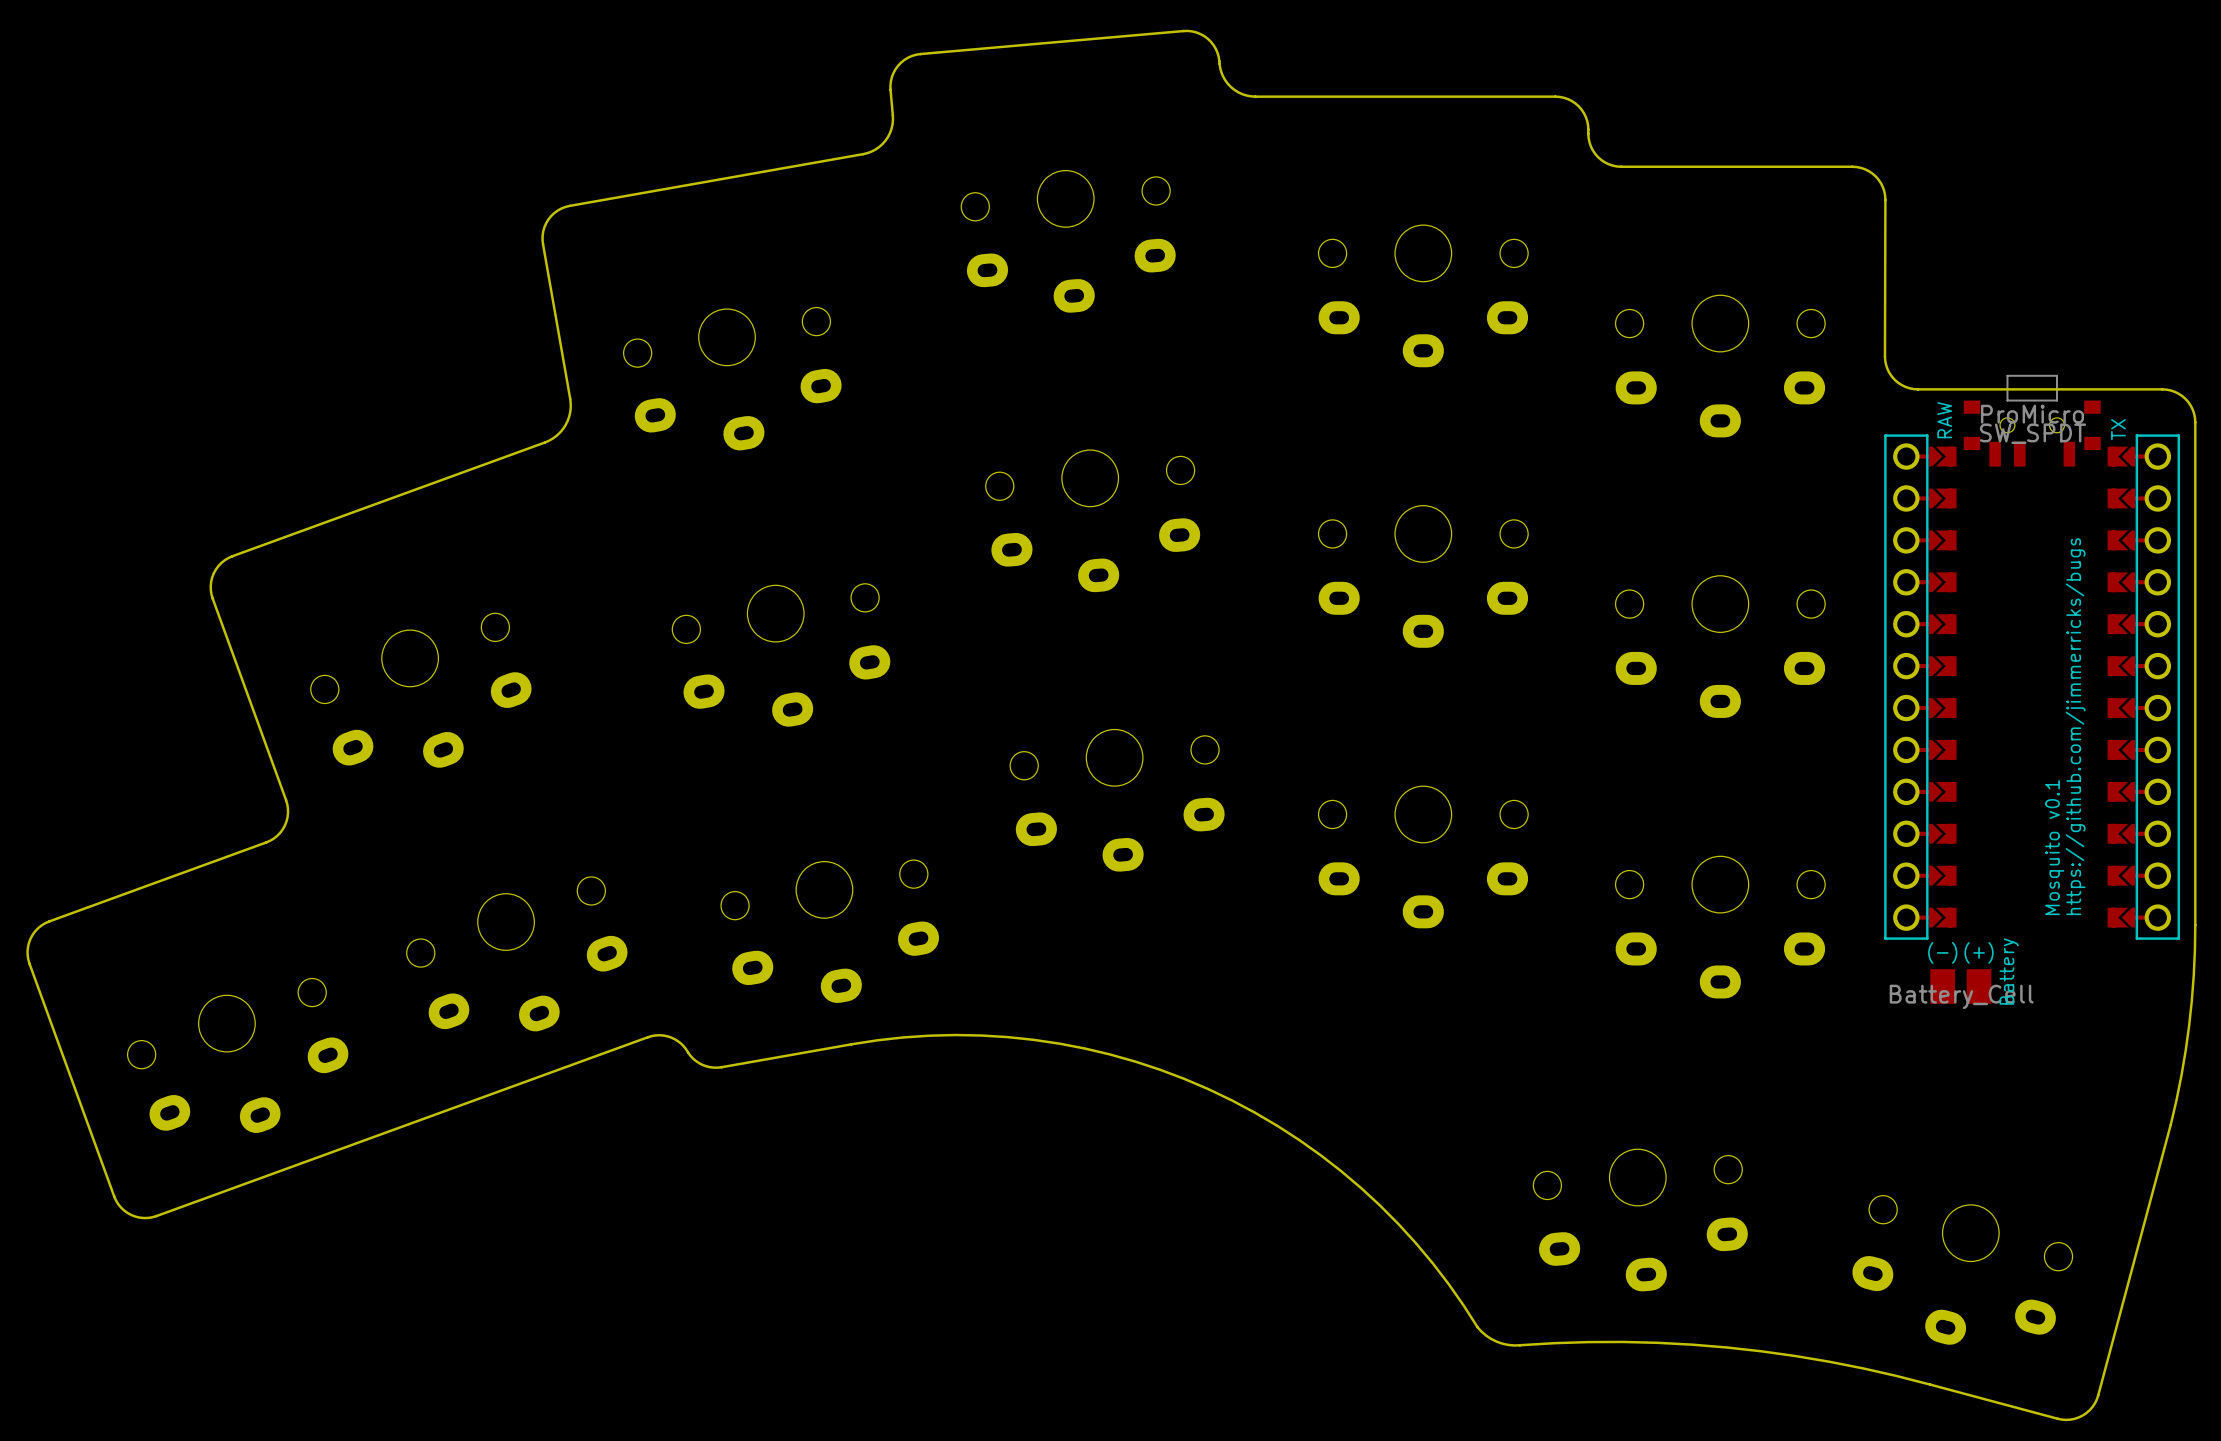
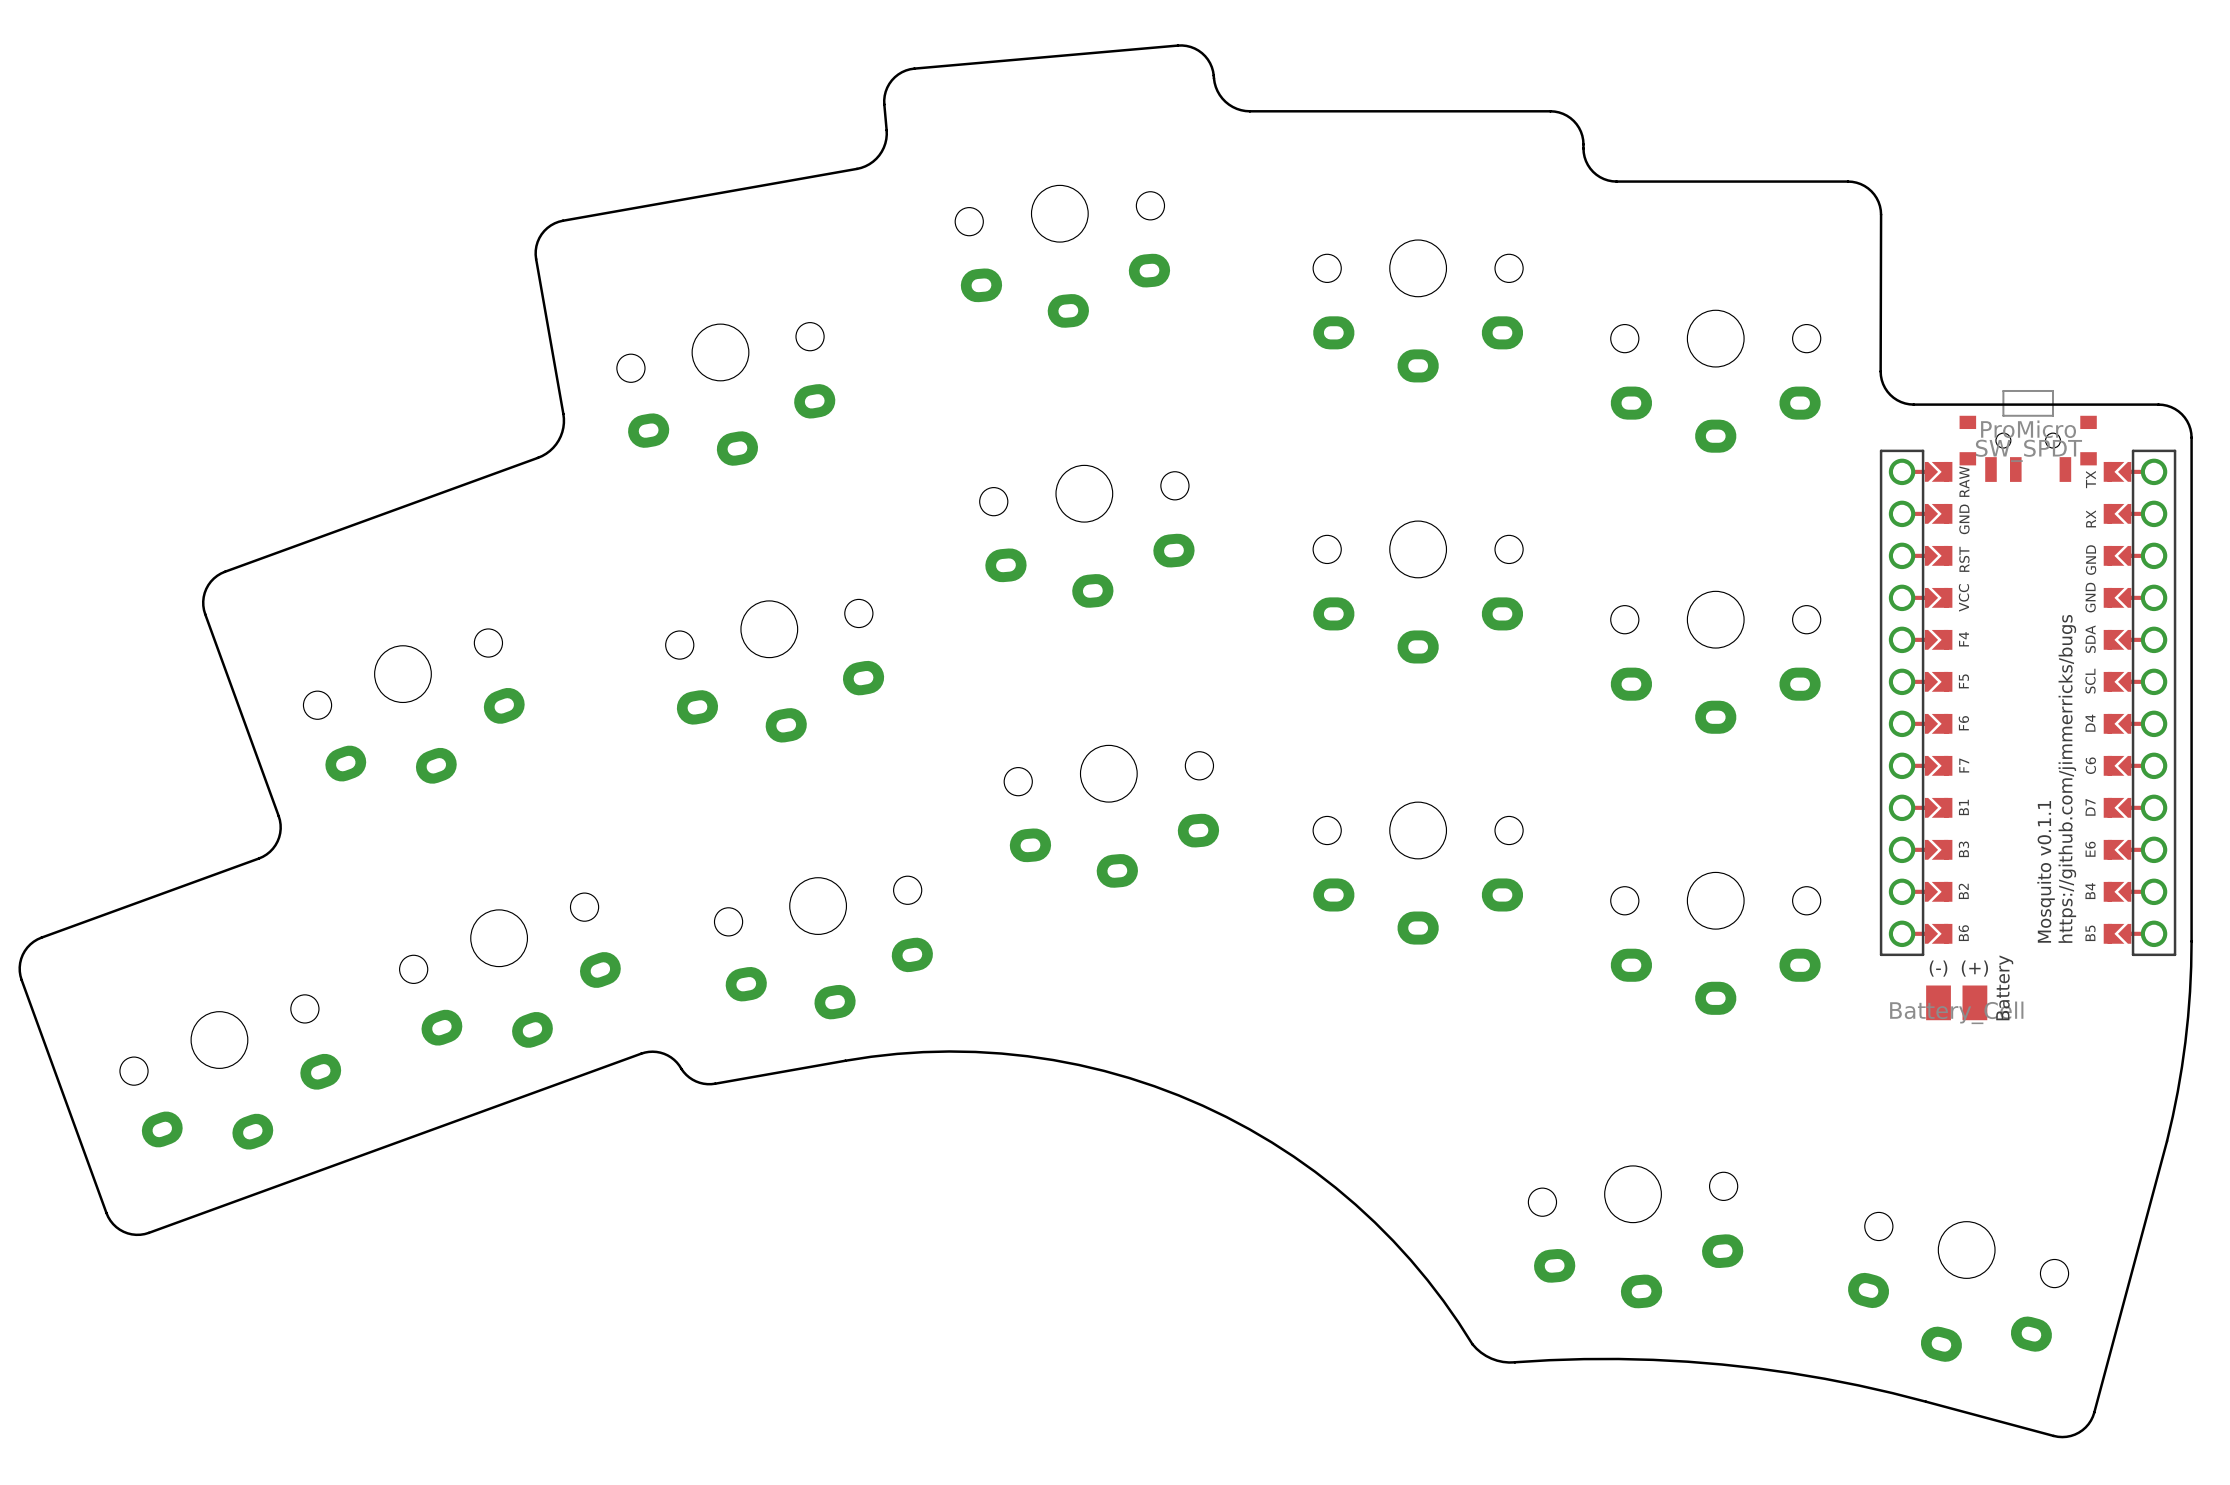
part footprint: [1884, 434, 2181, 940] -> [1879, 449, 2177, 957]
text position: https://github.com/jimmerricks/bugs (2075, 726) -> https://github.com/jimmerricks/bugs (2067, 778)
text: Mosquito v0.1 (2054, 847) -> Mosquito v0.1.1 (2046, 871)

